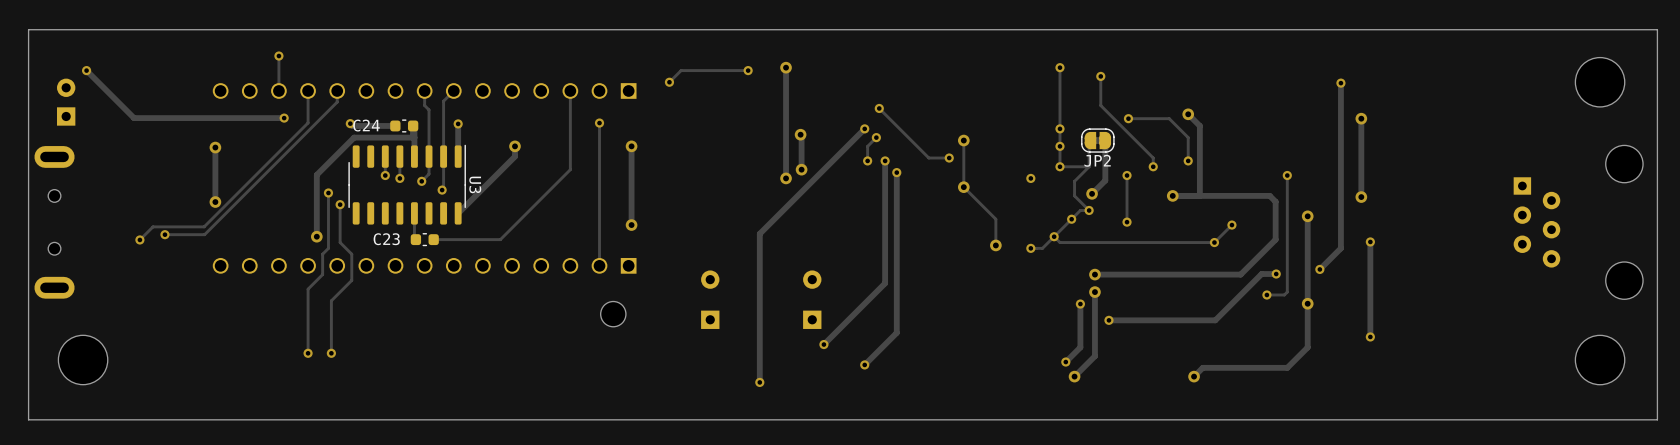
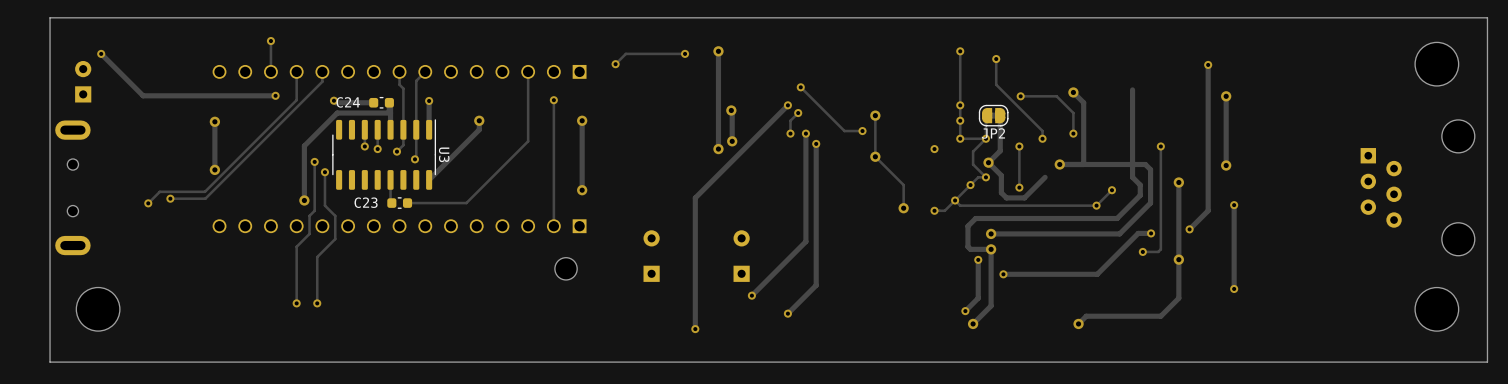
track: none -> (1132, 89) (1132, 177) (1140, 185) (1140, 195) (1117, 218) (975, 218) (967, 226) (967, 246) (970, 249) (991, 249)
via: none -> (985, 138)
track: none -> (988, 162) (1001, 175) (1001, 192) (1006, 197) (1024, 197) (1045, 177)

